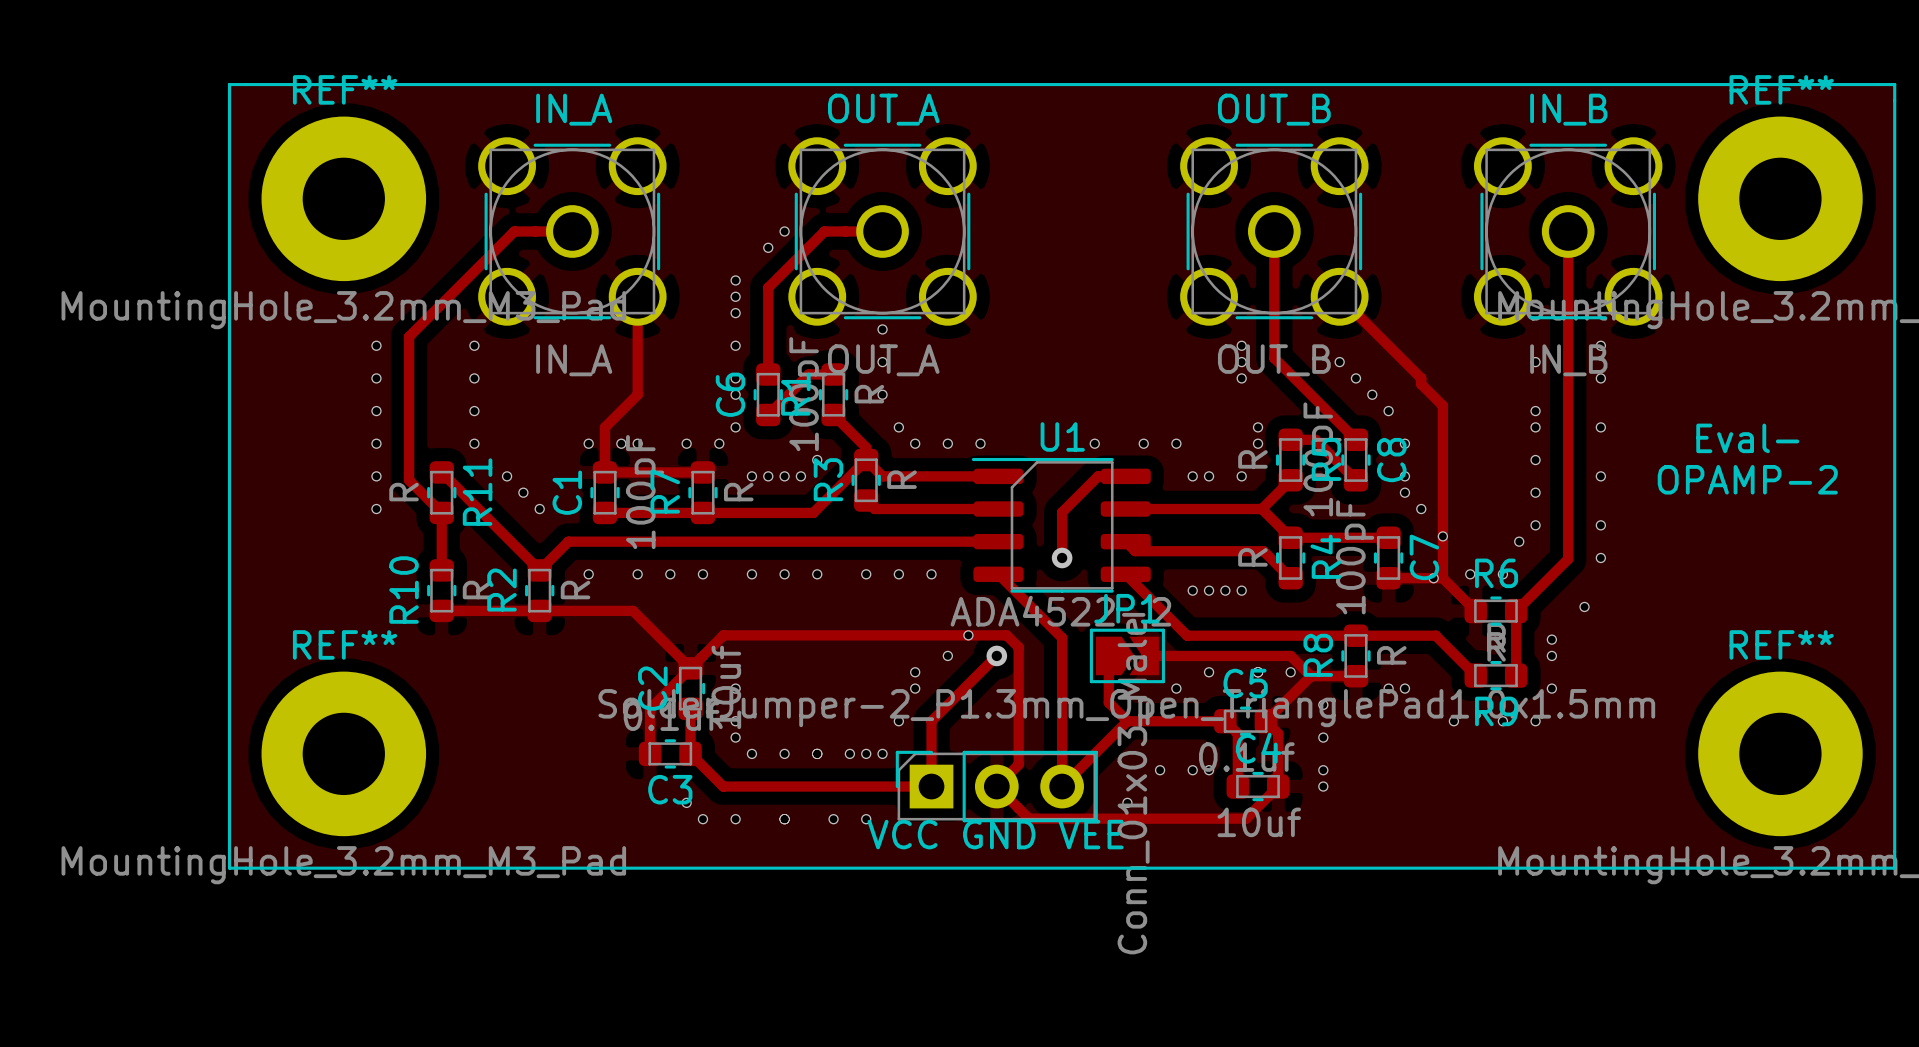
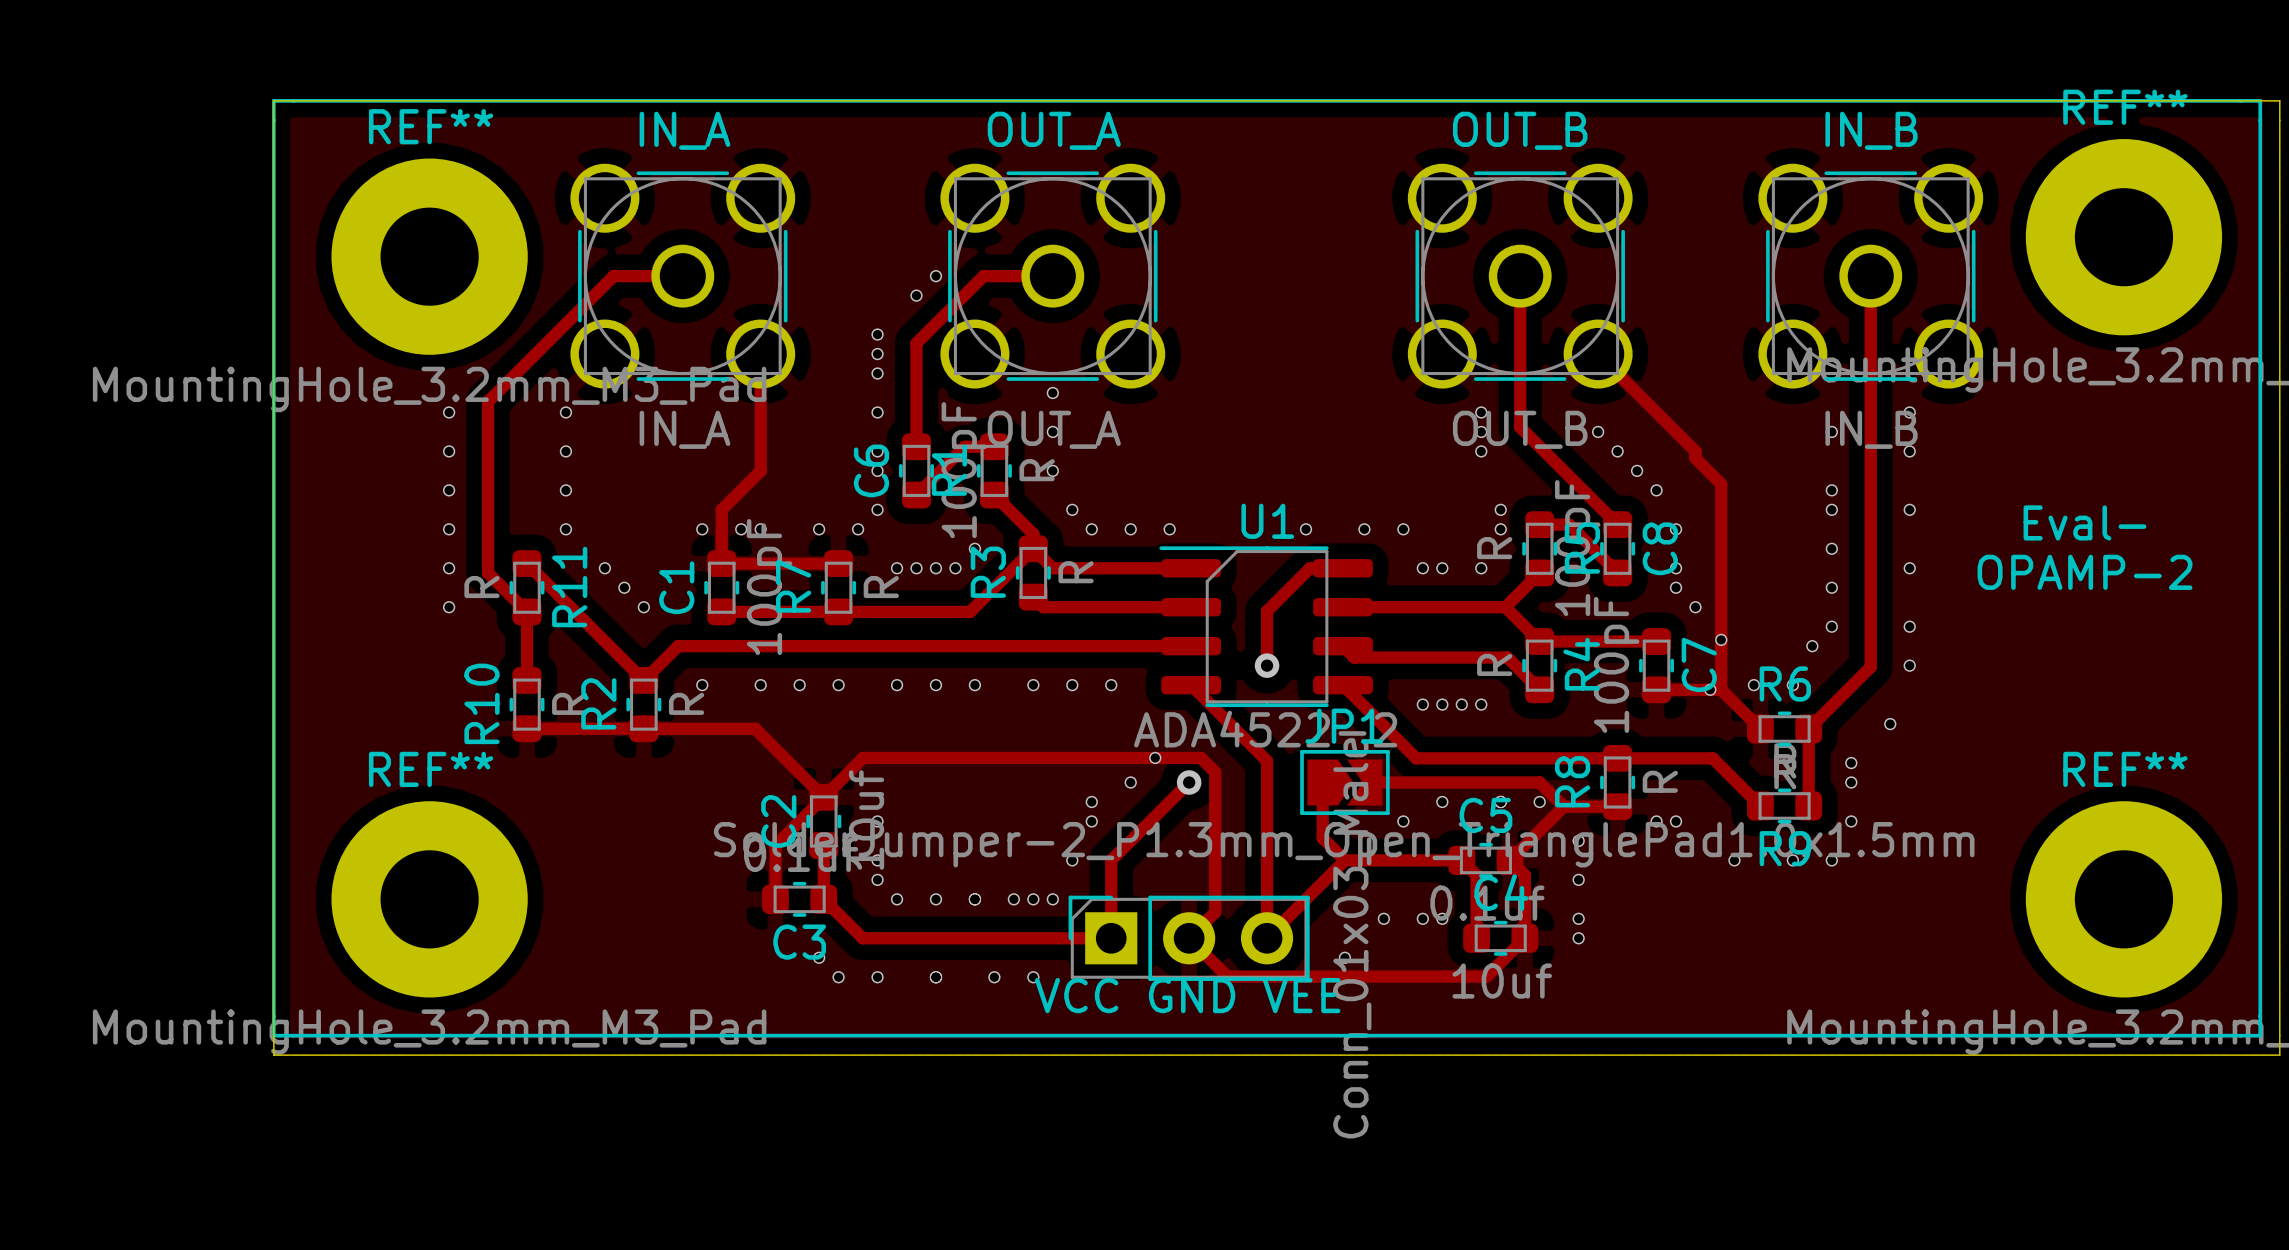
board edge: none -> (273, 100) (273, 1055) (2279, 1055) (2279, 100) (273, 100)
REF** position: (343, 198) -> (429, 256)
REF** position: (343, 753) -> (429, 899)

